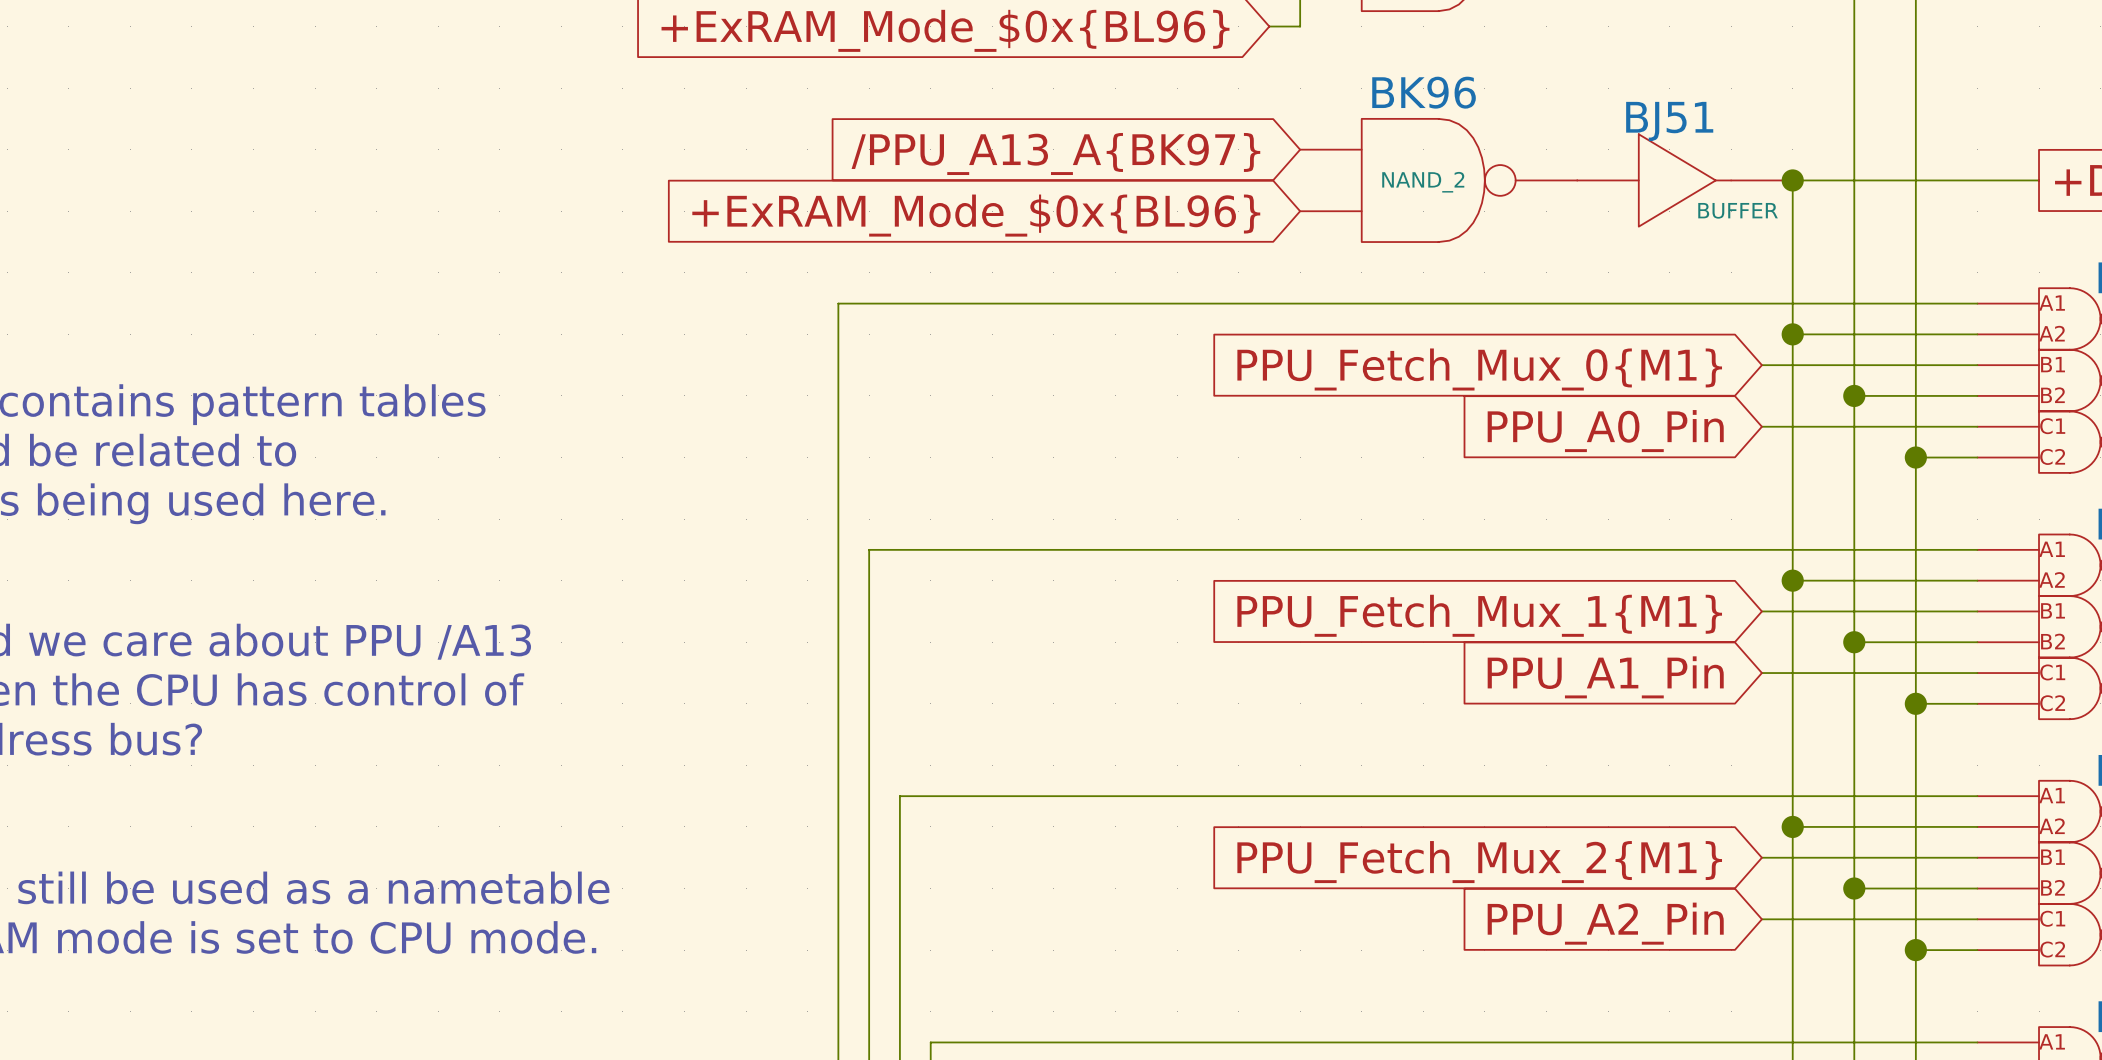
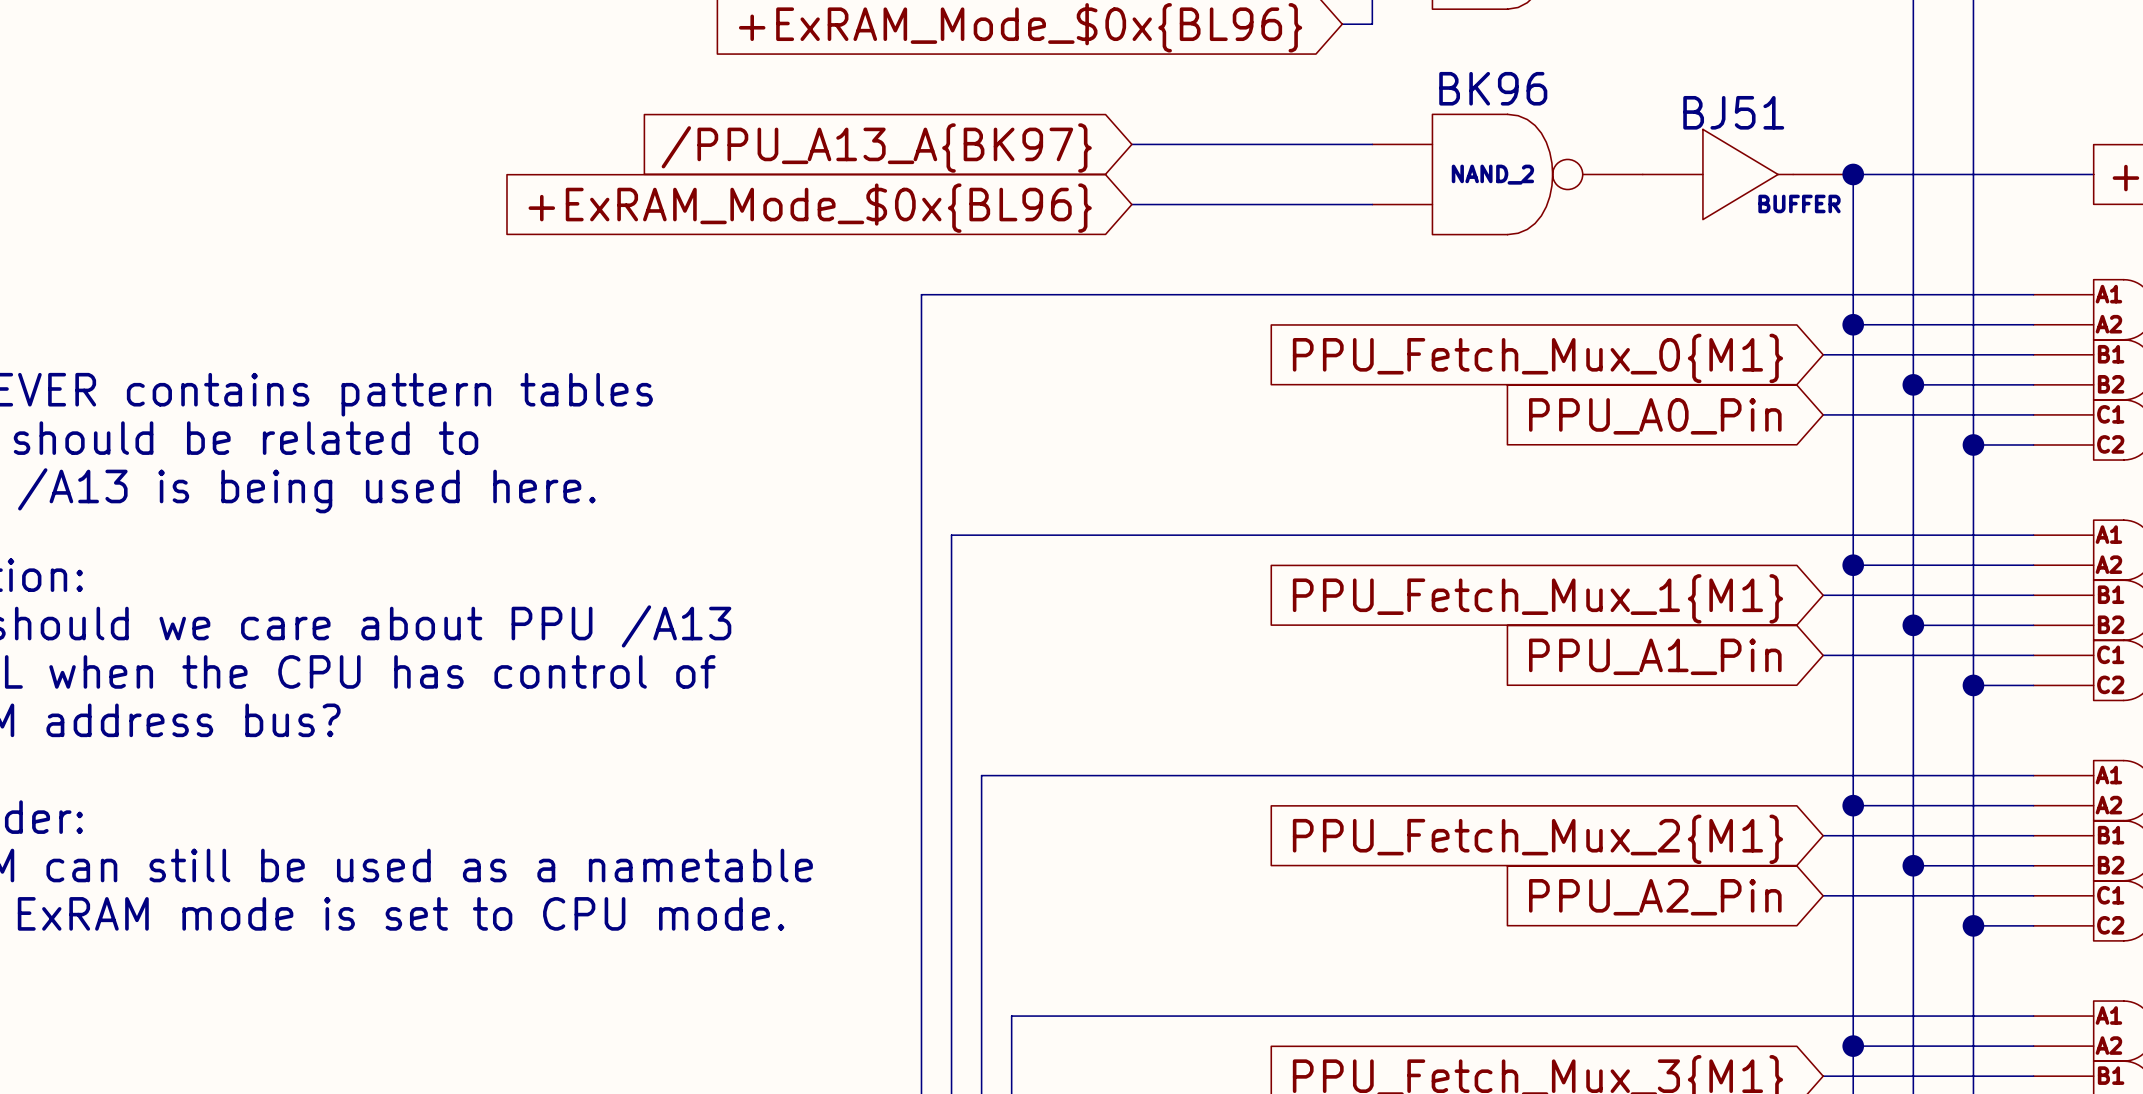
wire: none -> (1131, 144) (1372, 144)
global label position: /PPU_A13_A{BK97} (1055, 153) -> /PPU_A13_A{BK97} (876, 148)
wire: none -> (1131, 204) (1372, 204)
global label position: +ExRAM_Mode_$0x{BL96} (976, 215) -> +ExRAM_Mode_$0x{BL96} (810, 208)

